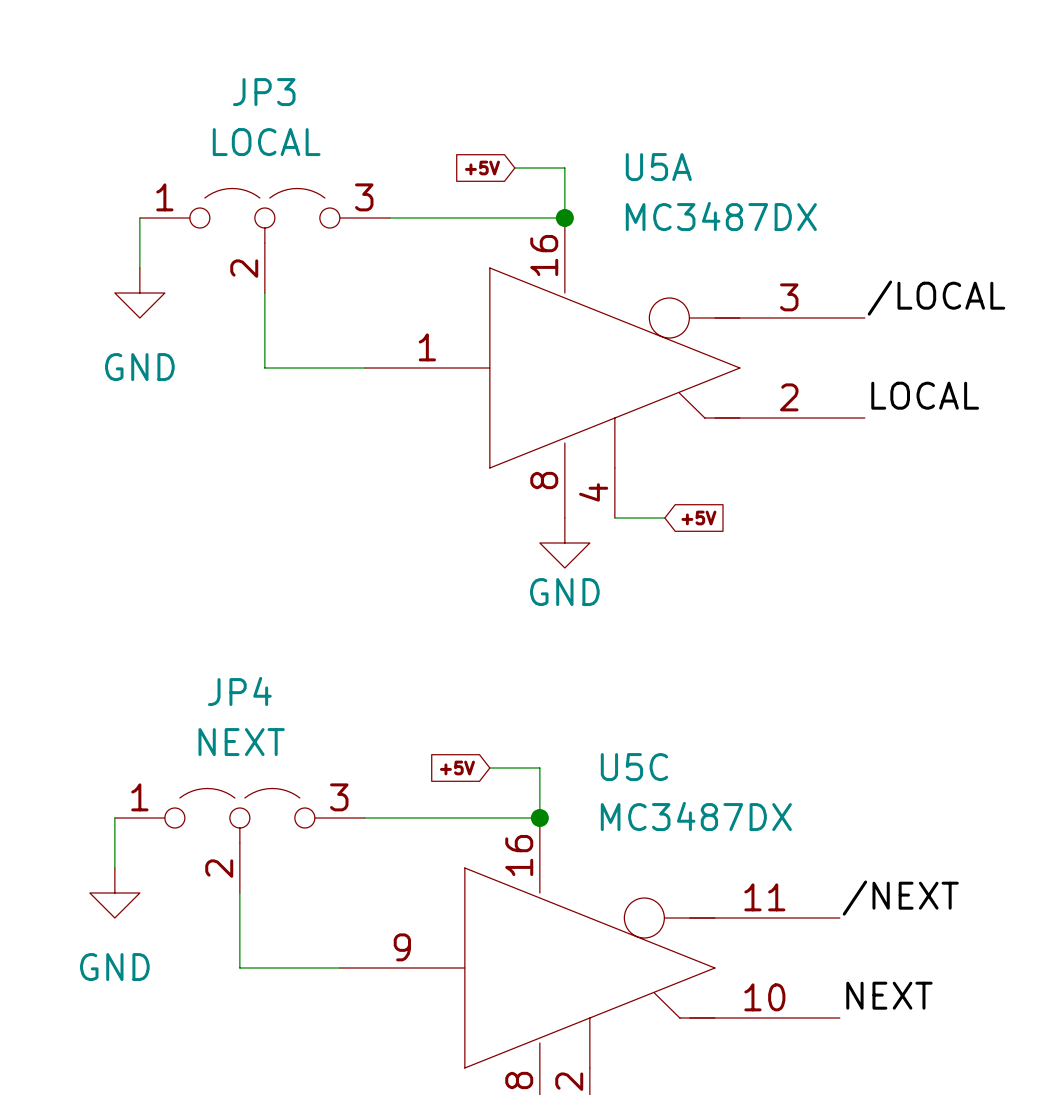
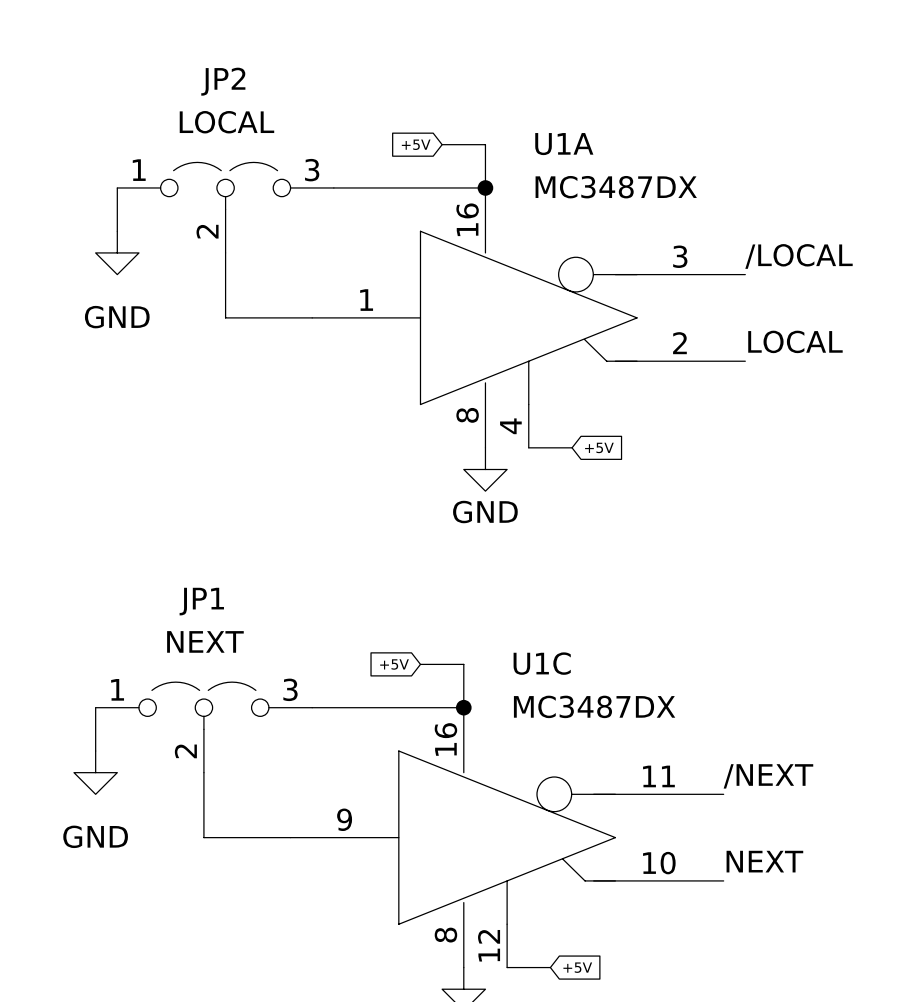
JP3 name: JP3 (264, 92) -> JP2 (223, 81)
U5A name: U5A (658, 167) -> U1A (564, 144)
JP4 name: JP4 (239, 691) -> JP1 (201, 601)
U5C name: U5C (634, 767) -> U1C (542, 663)

